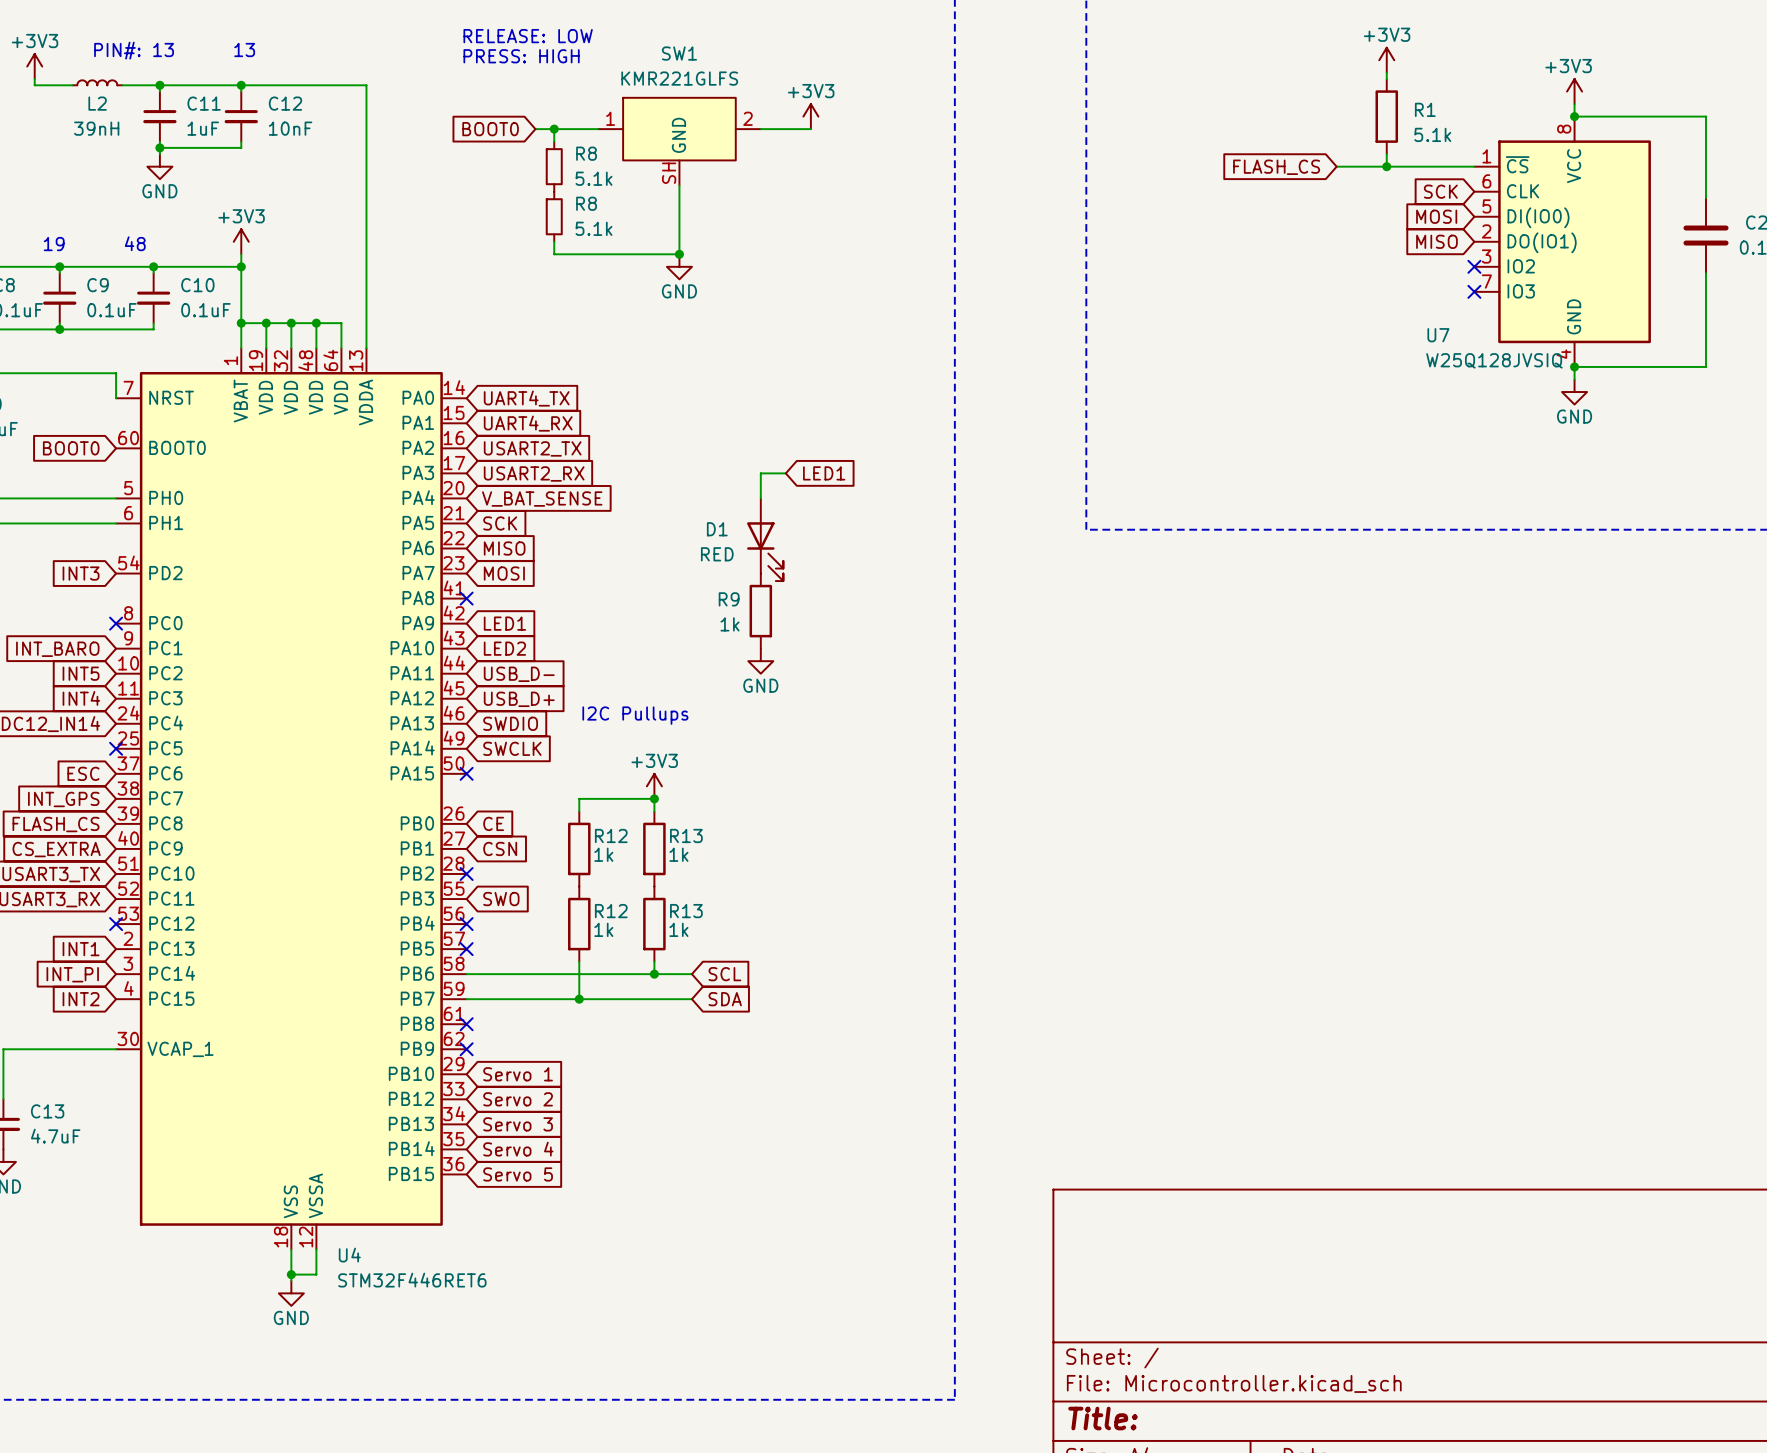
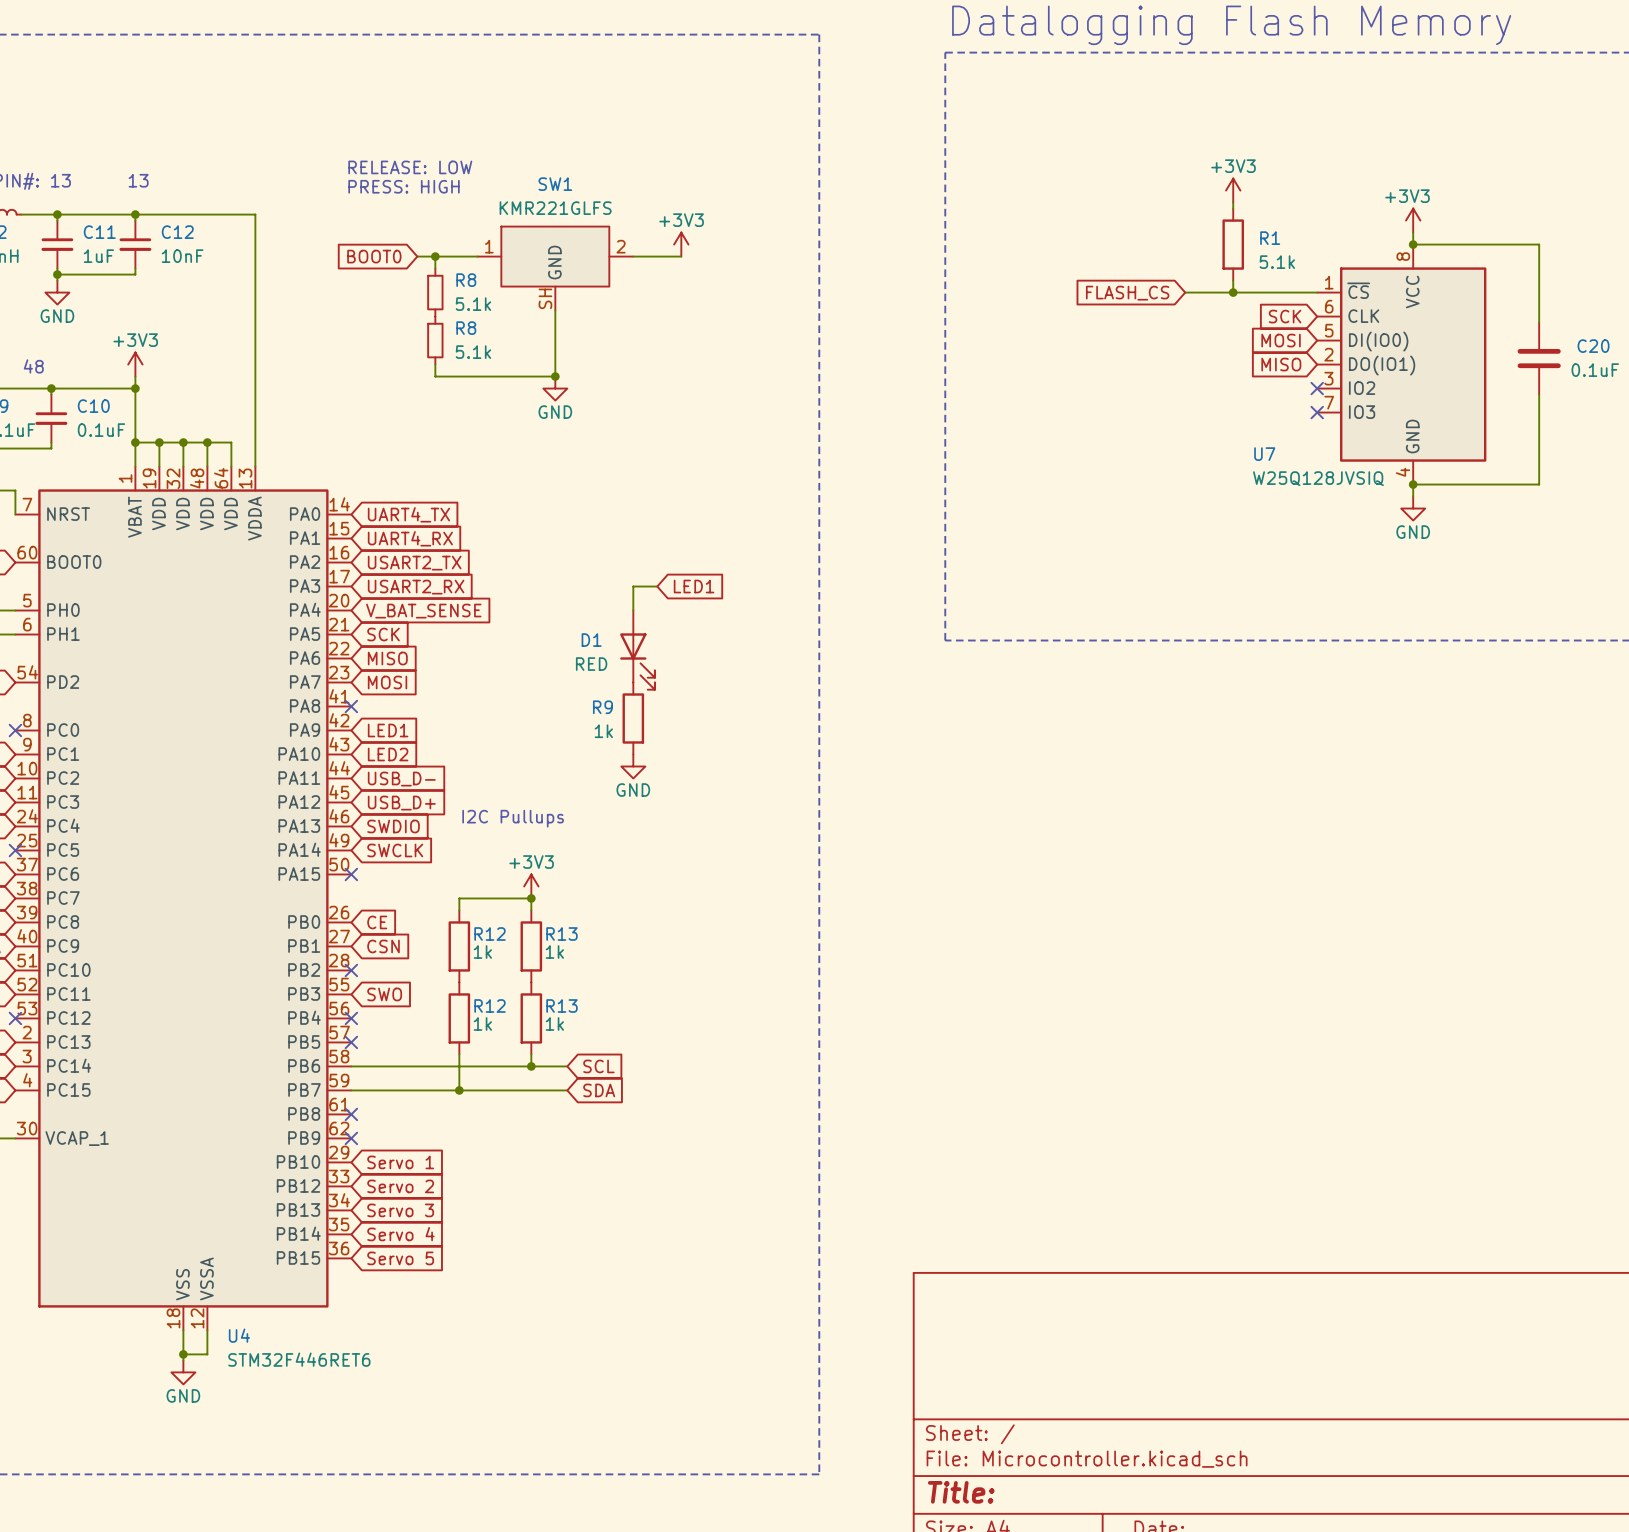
U7 name position: U7 (1438, 335) -> U7 (1264, 454)
U7 value position: W25Q128JVSIQ (1494, 360) -> W25Q128JVSIQ (1318, 478)

